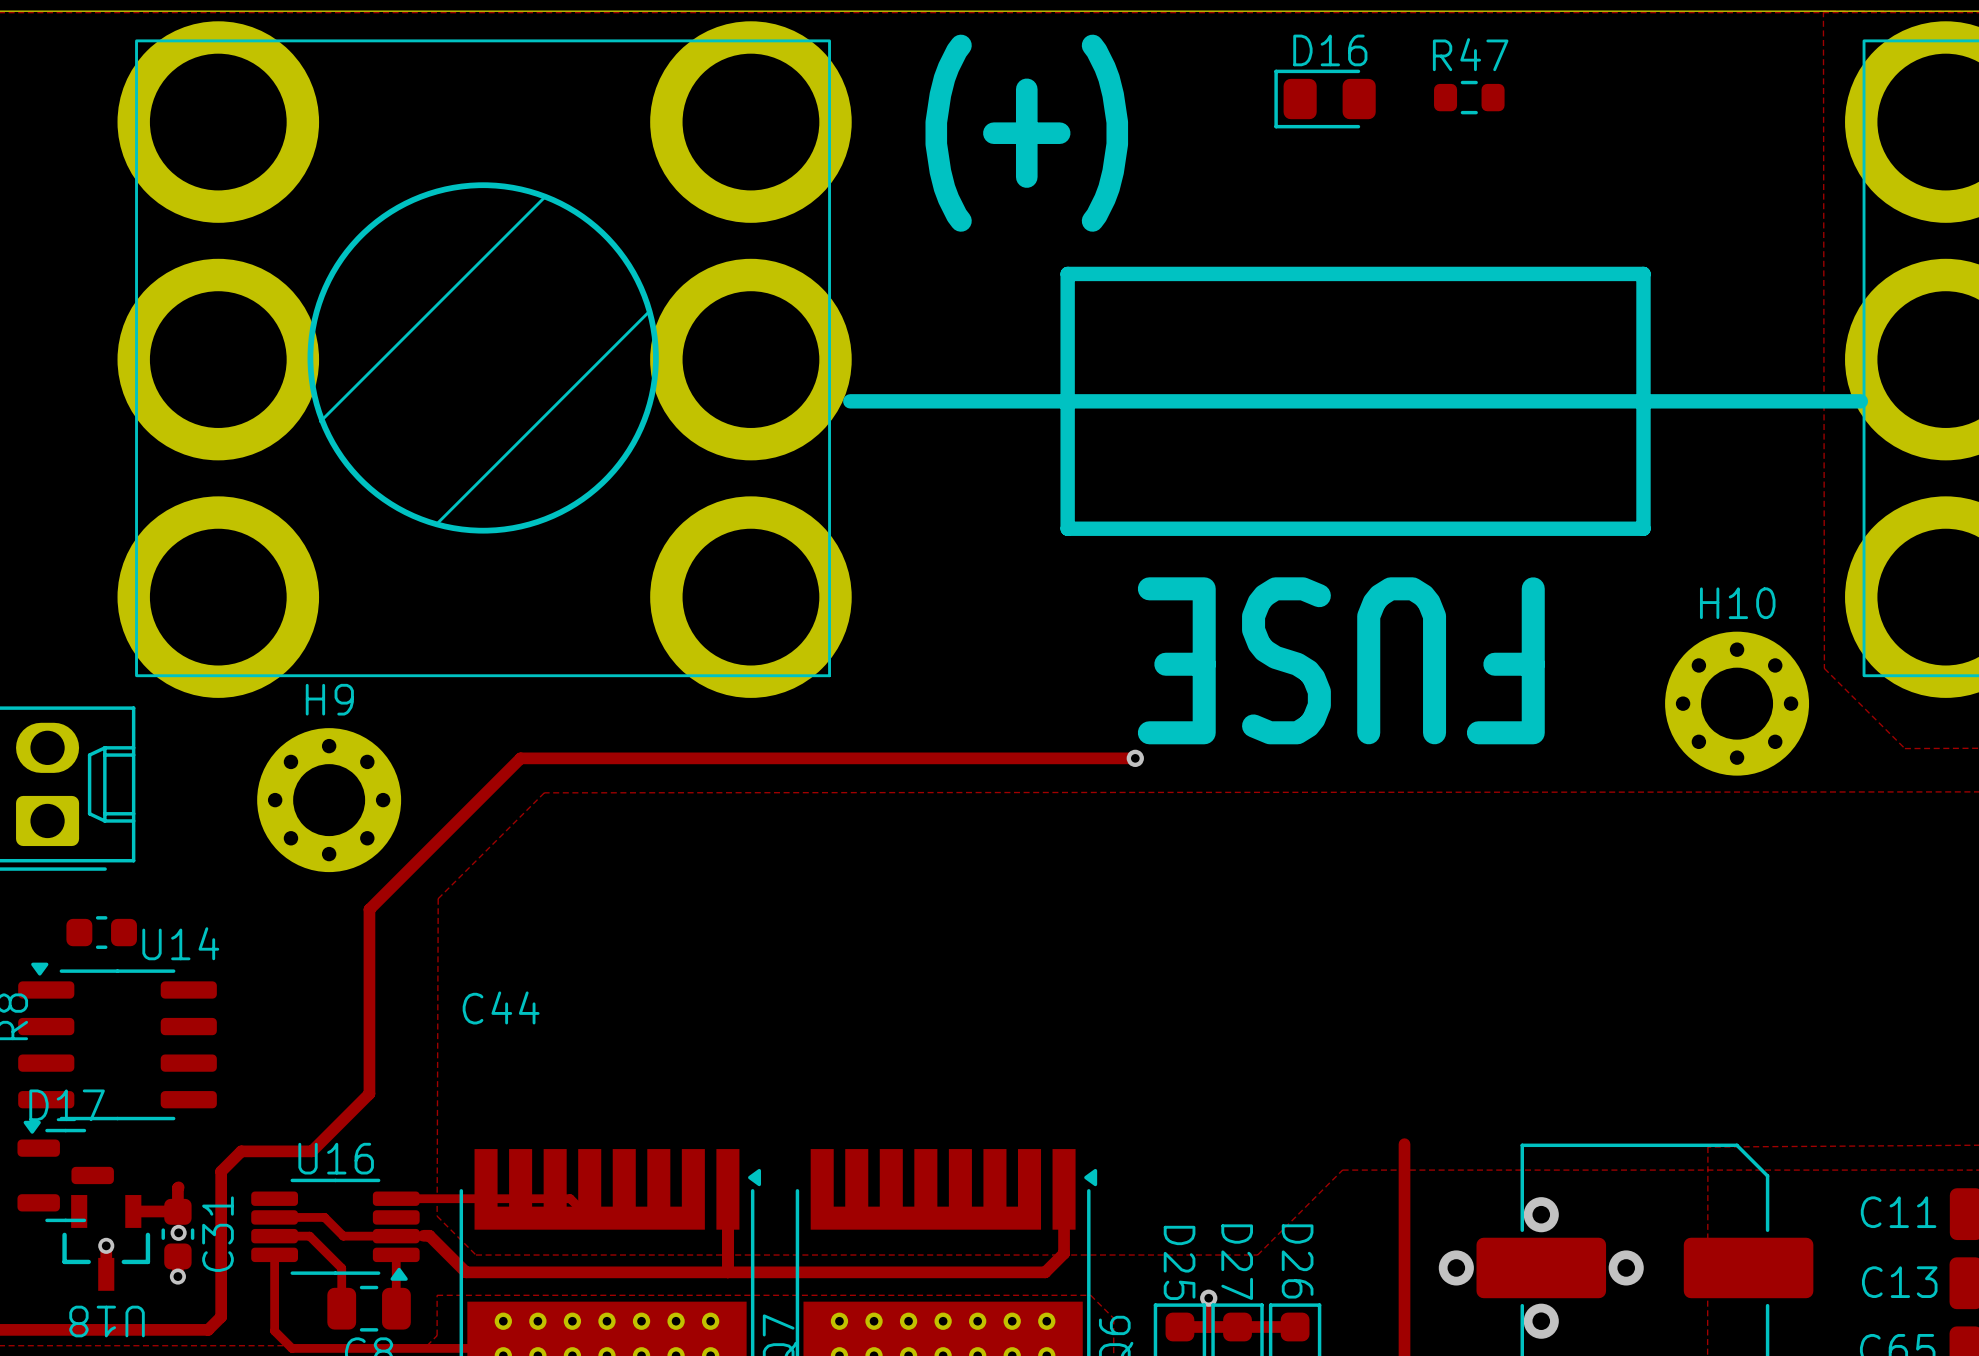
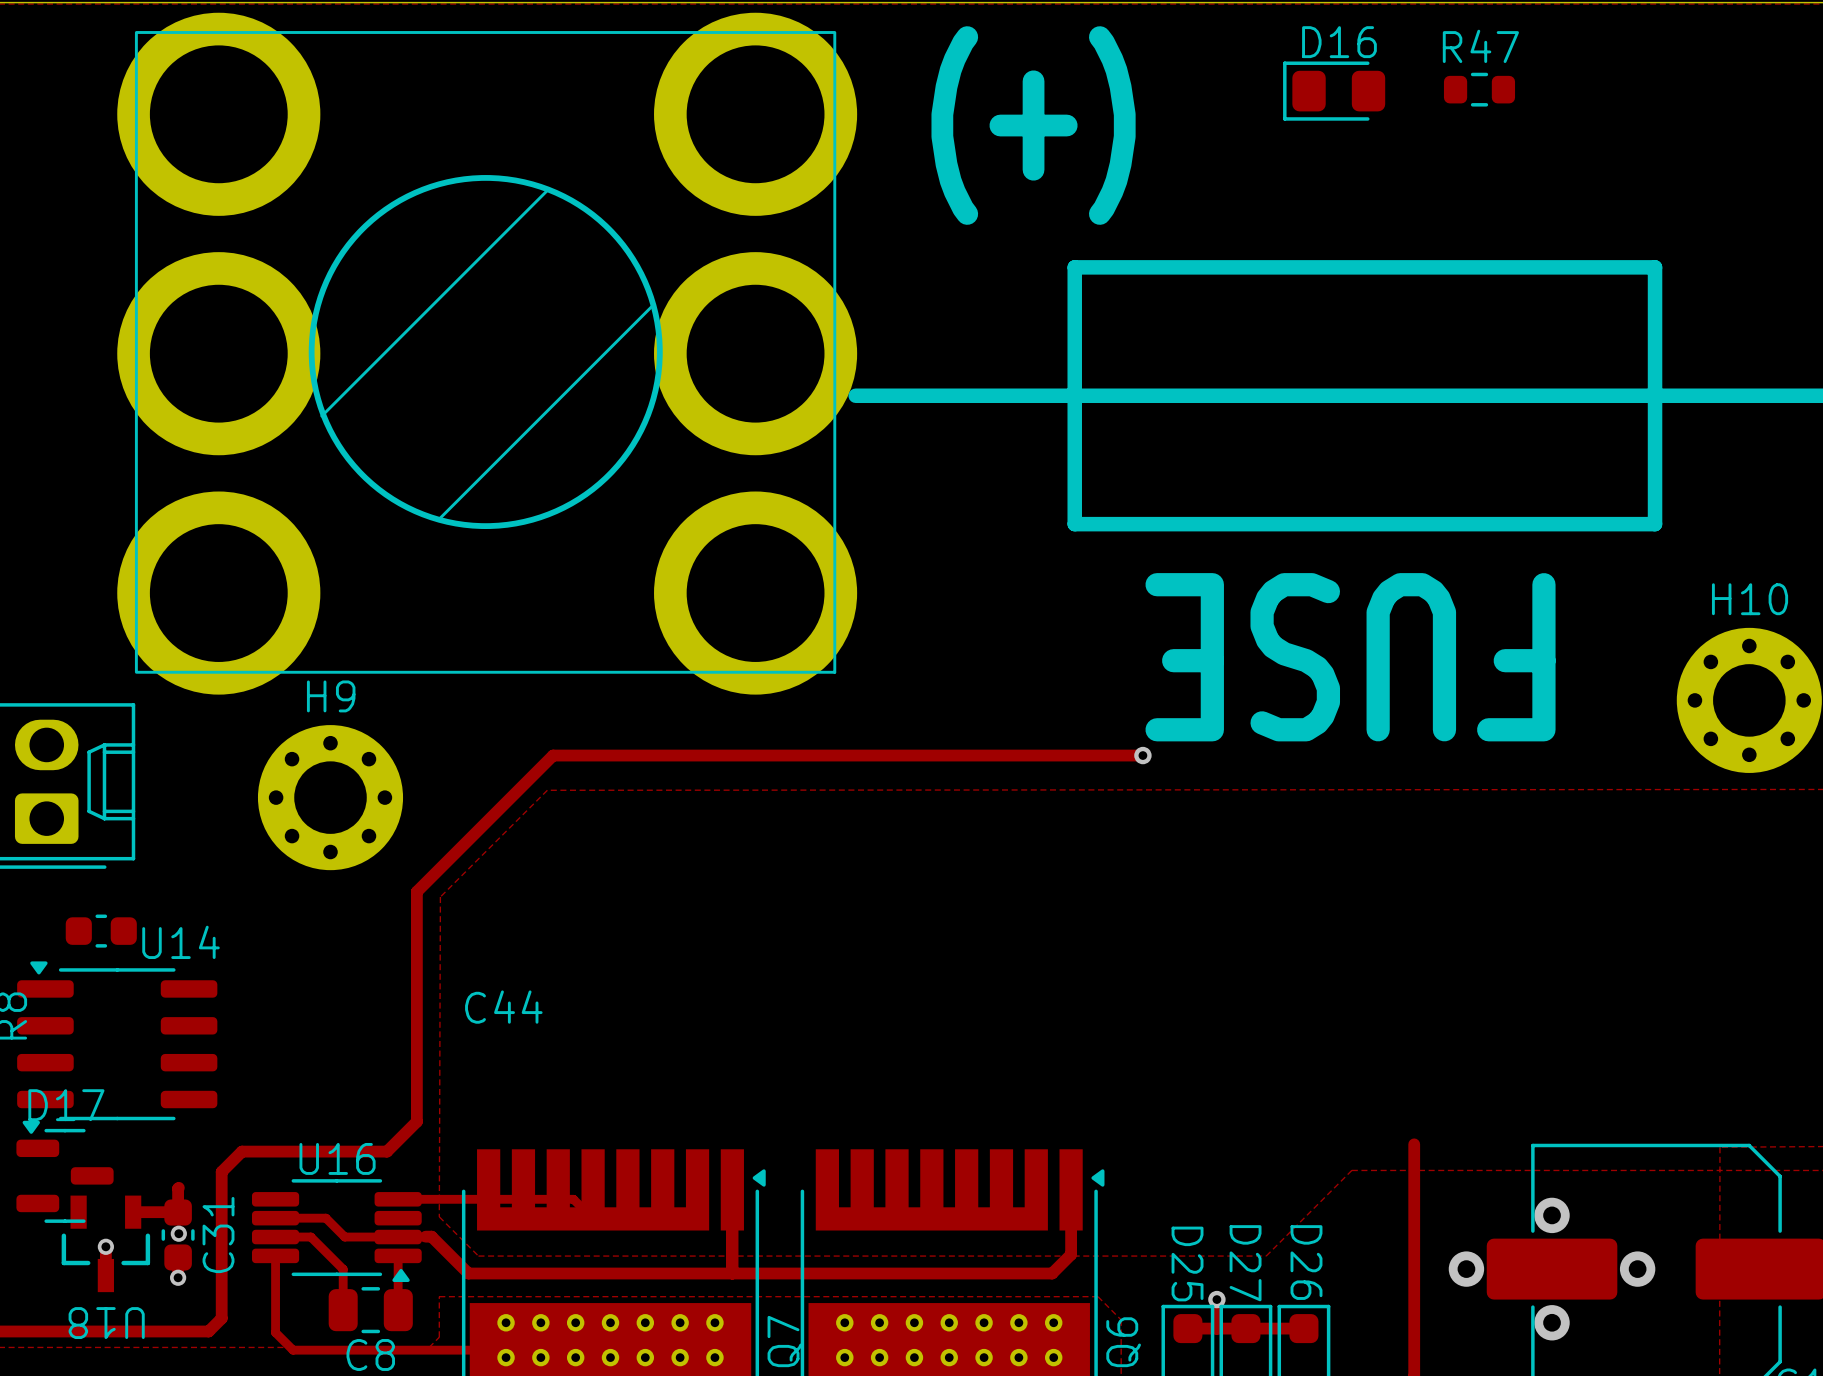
track: (550, 758) (520, 758) (369, 909) (369, 1093) (311, 1151) -> (553, 755) (416, 891) (416, 1121) (386, 1151) (313, 1151)

